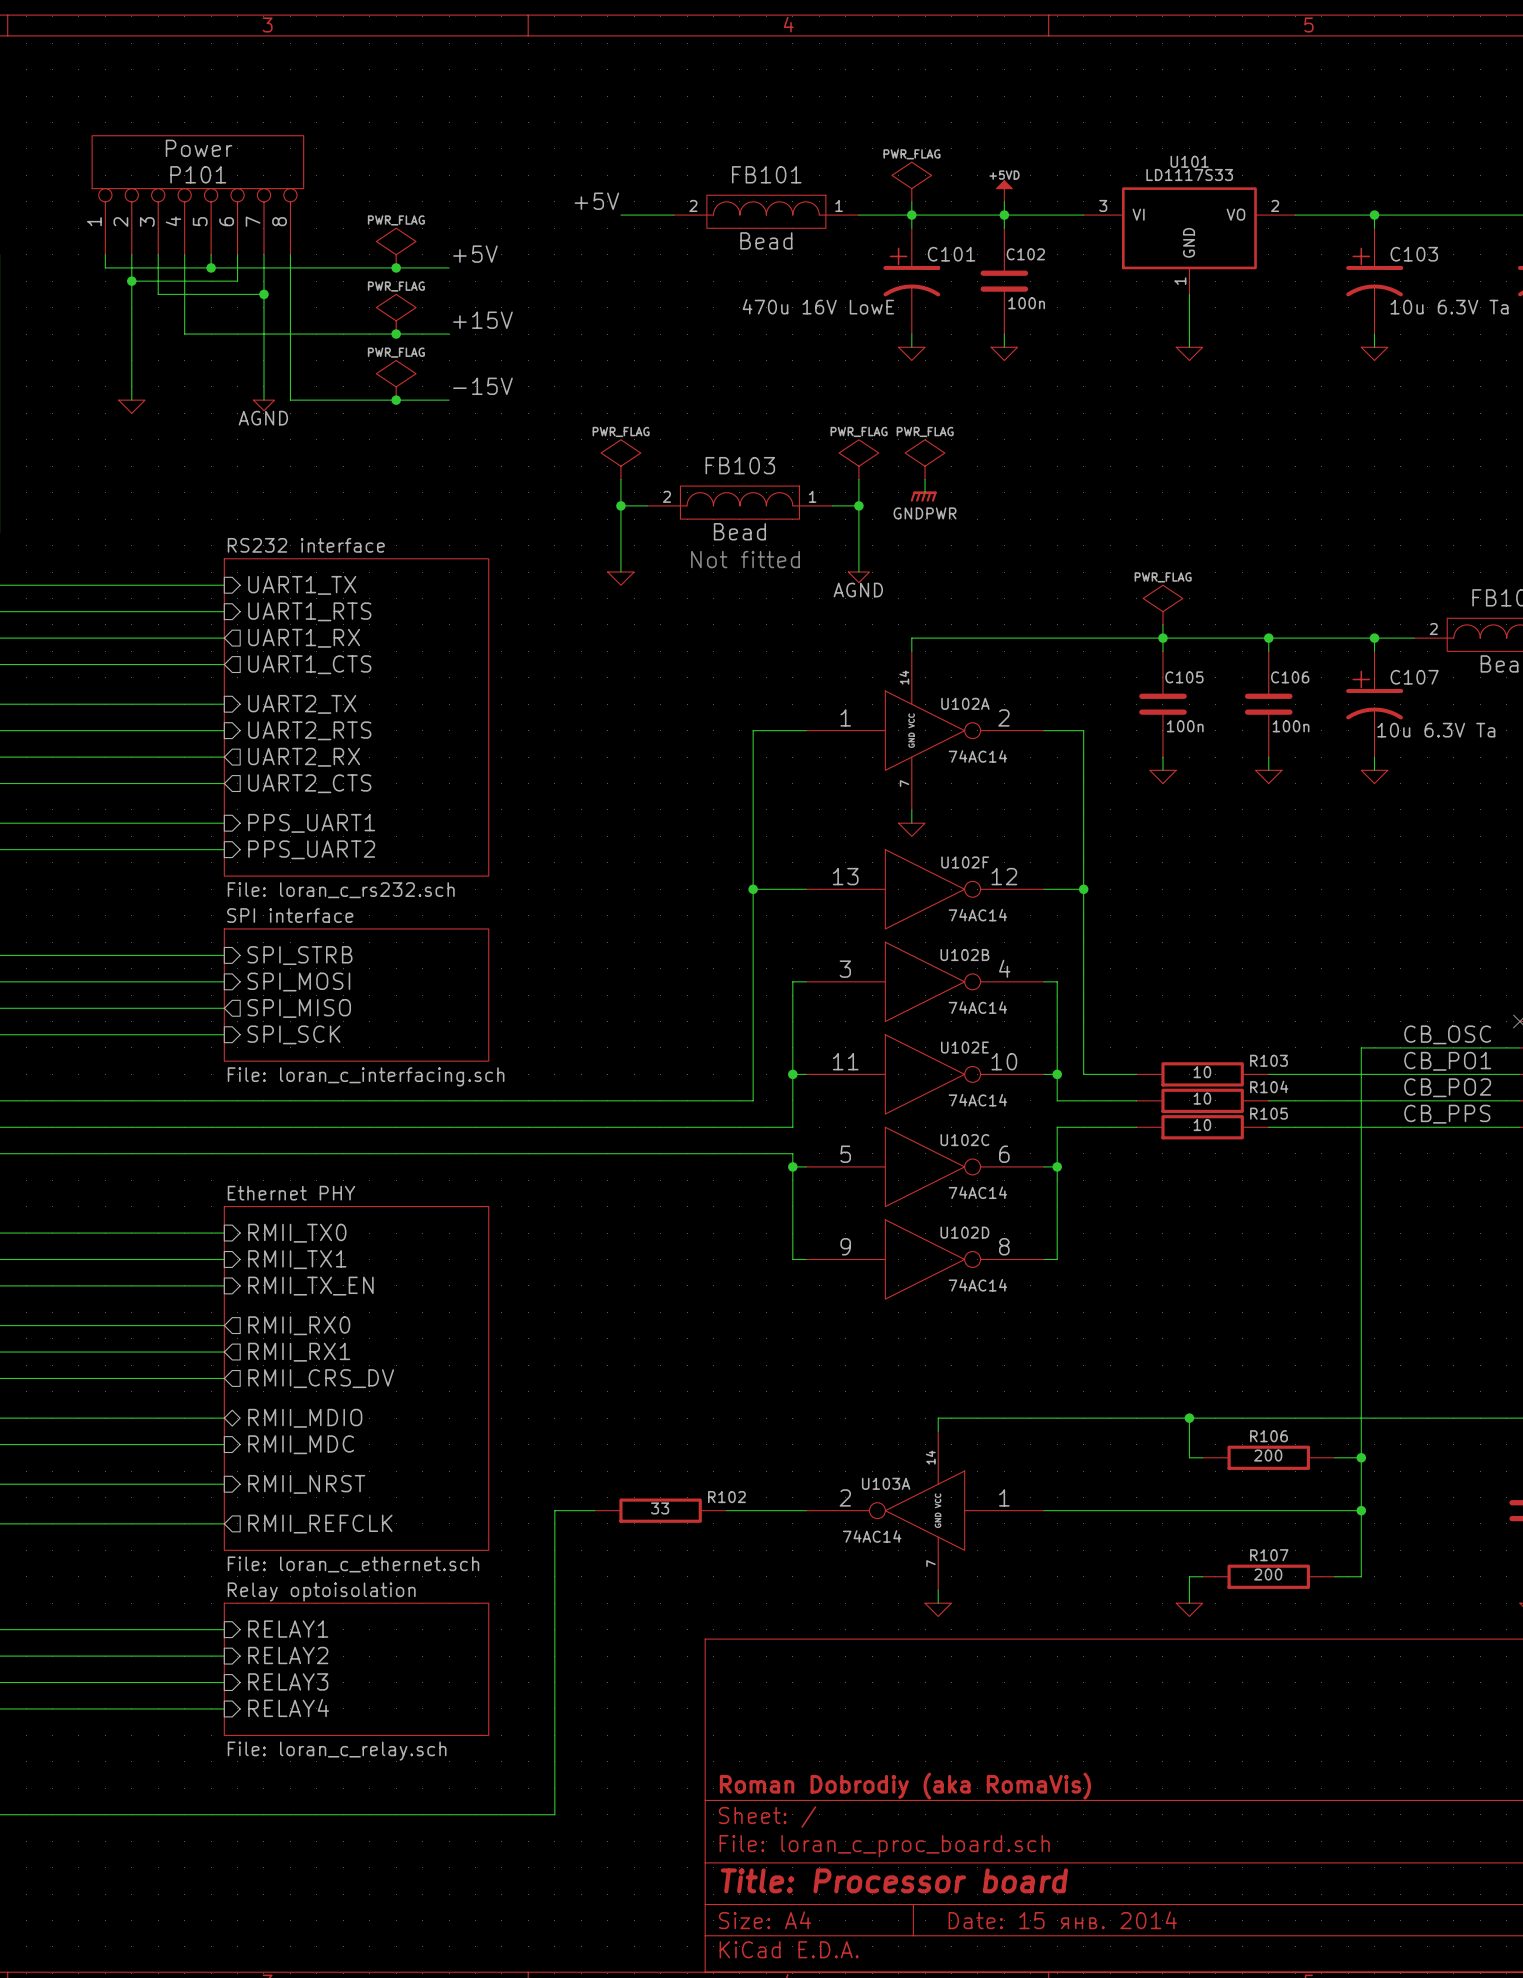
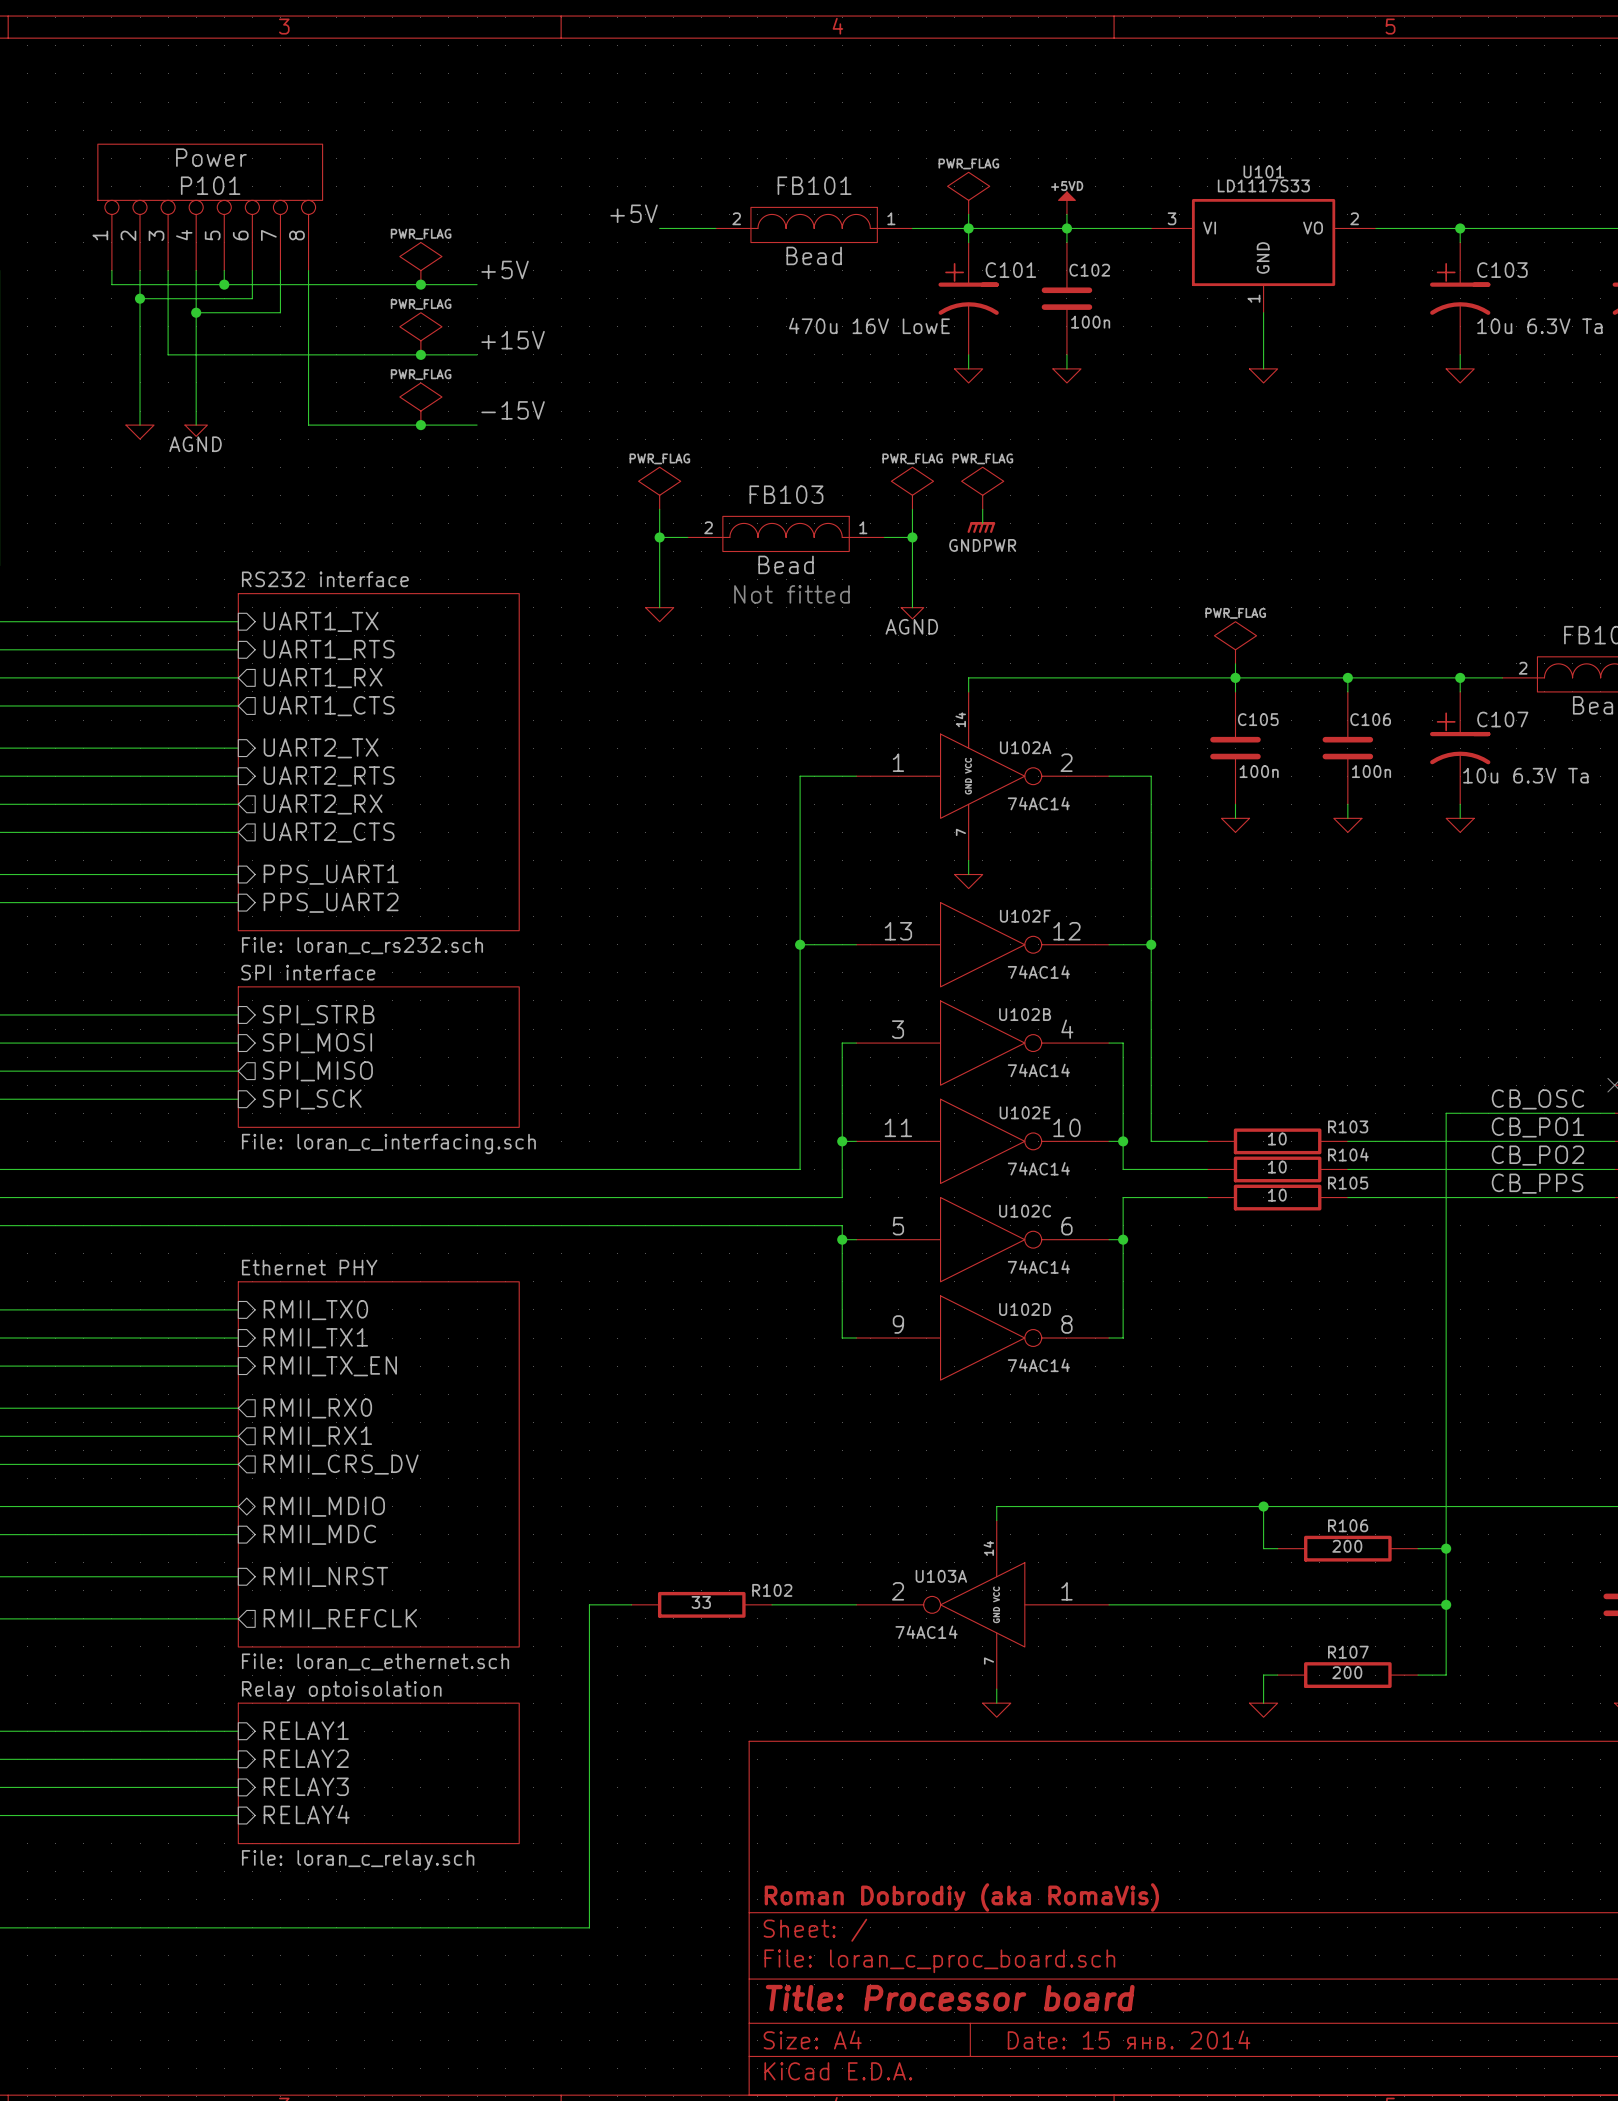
wire: (158, 294) (184, 294) -> (168, 312) (168, 354) (196, 354) (196, 425)
junction: none -> (196, 312)
wire: (263, 294) (263, 400) -> none
junction: (263, 294) -> none
power symbol position: AGND (263, 405) -> AGND (196, 430)

